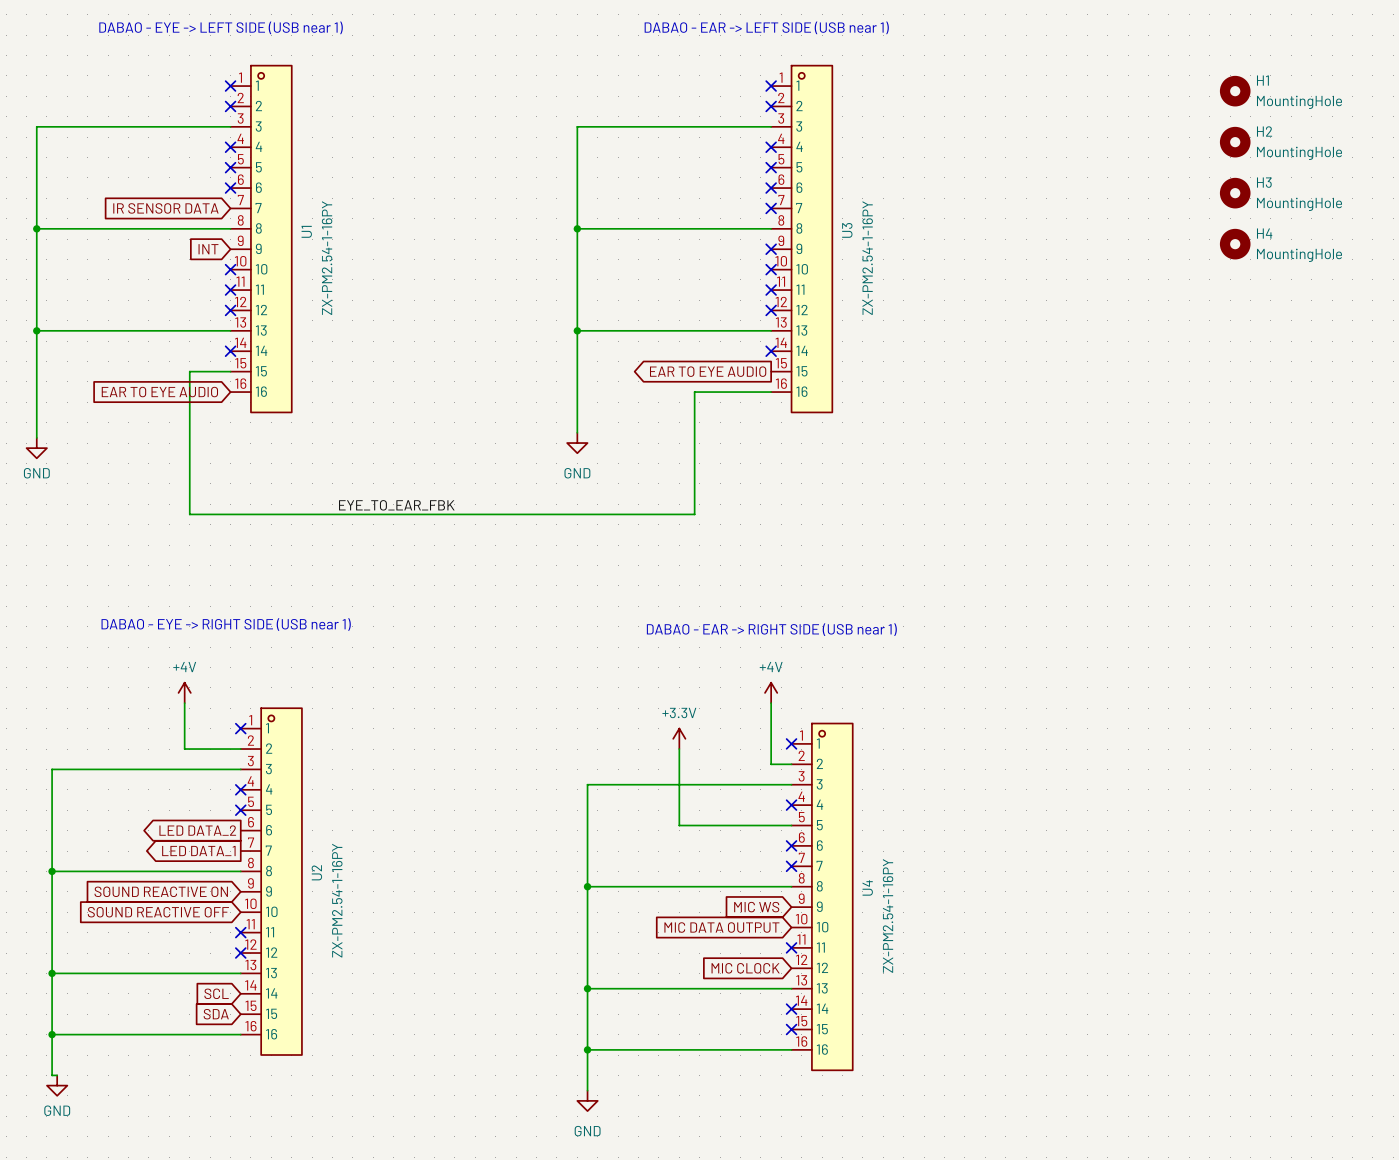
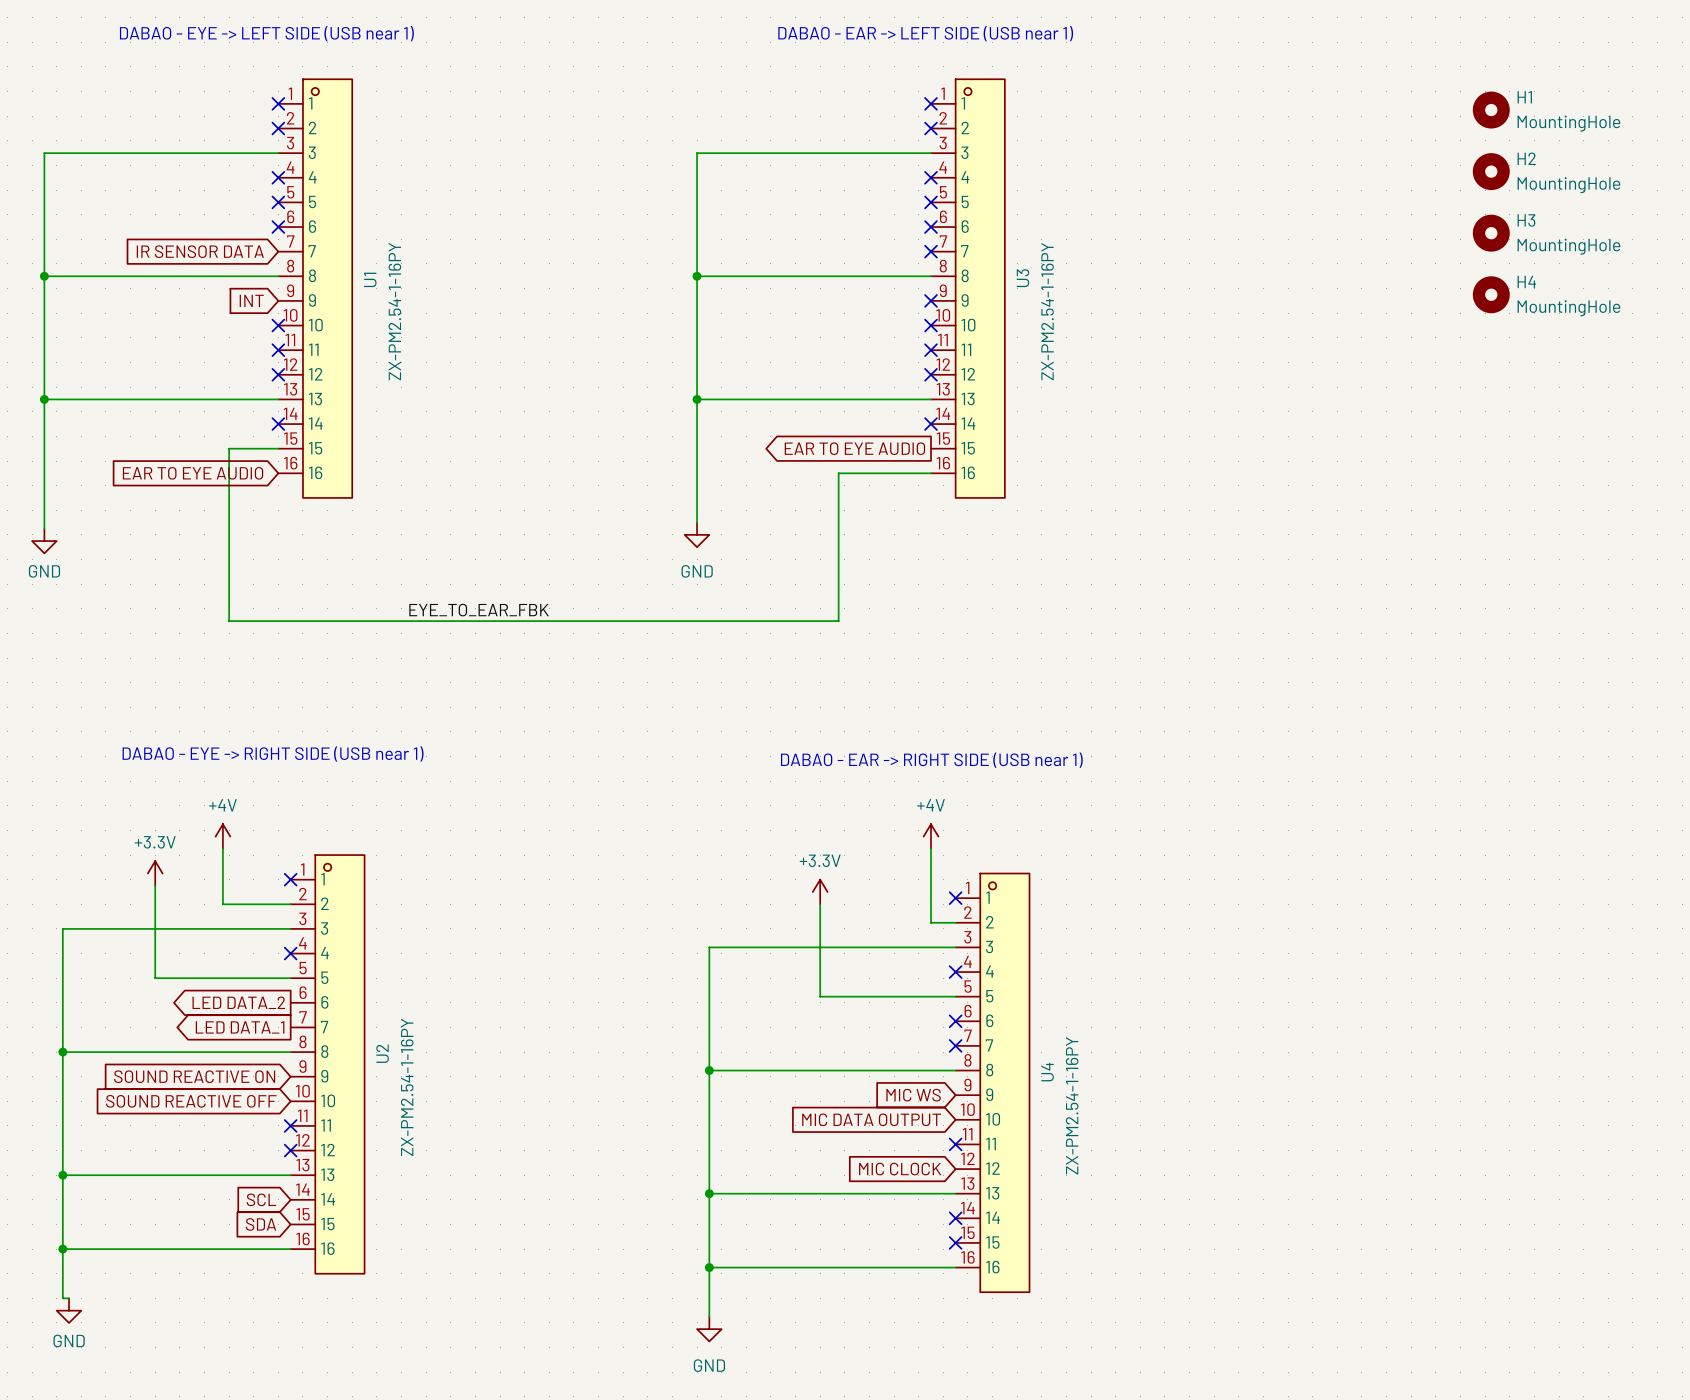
power symbol: none -> +3.3V (155, 873)
wire: none -> (155, 885) (155, 978) (290, 978)
no-connect mark: (240, 810) -> none

